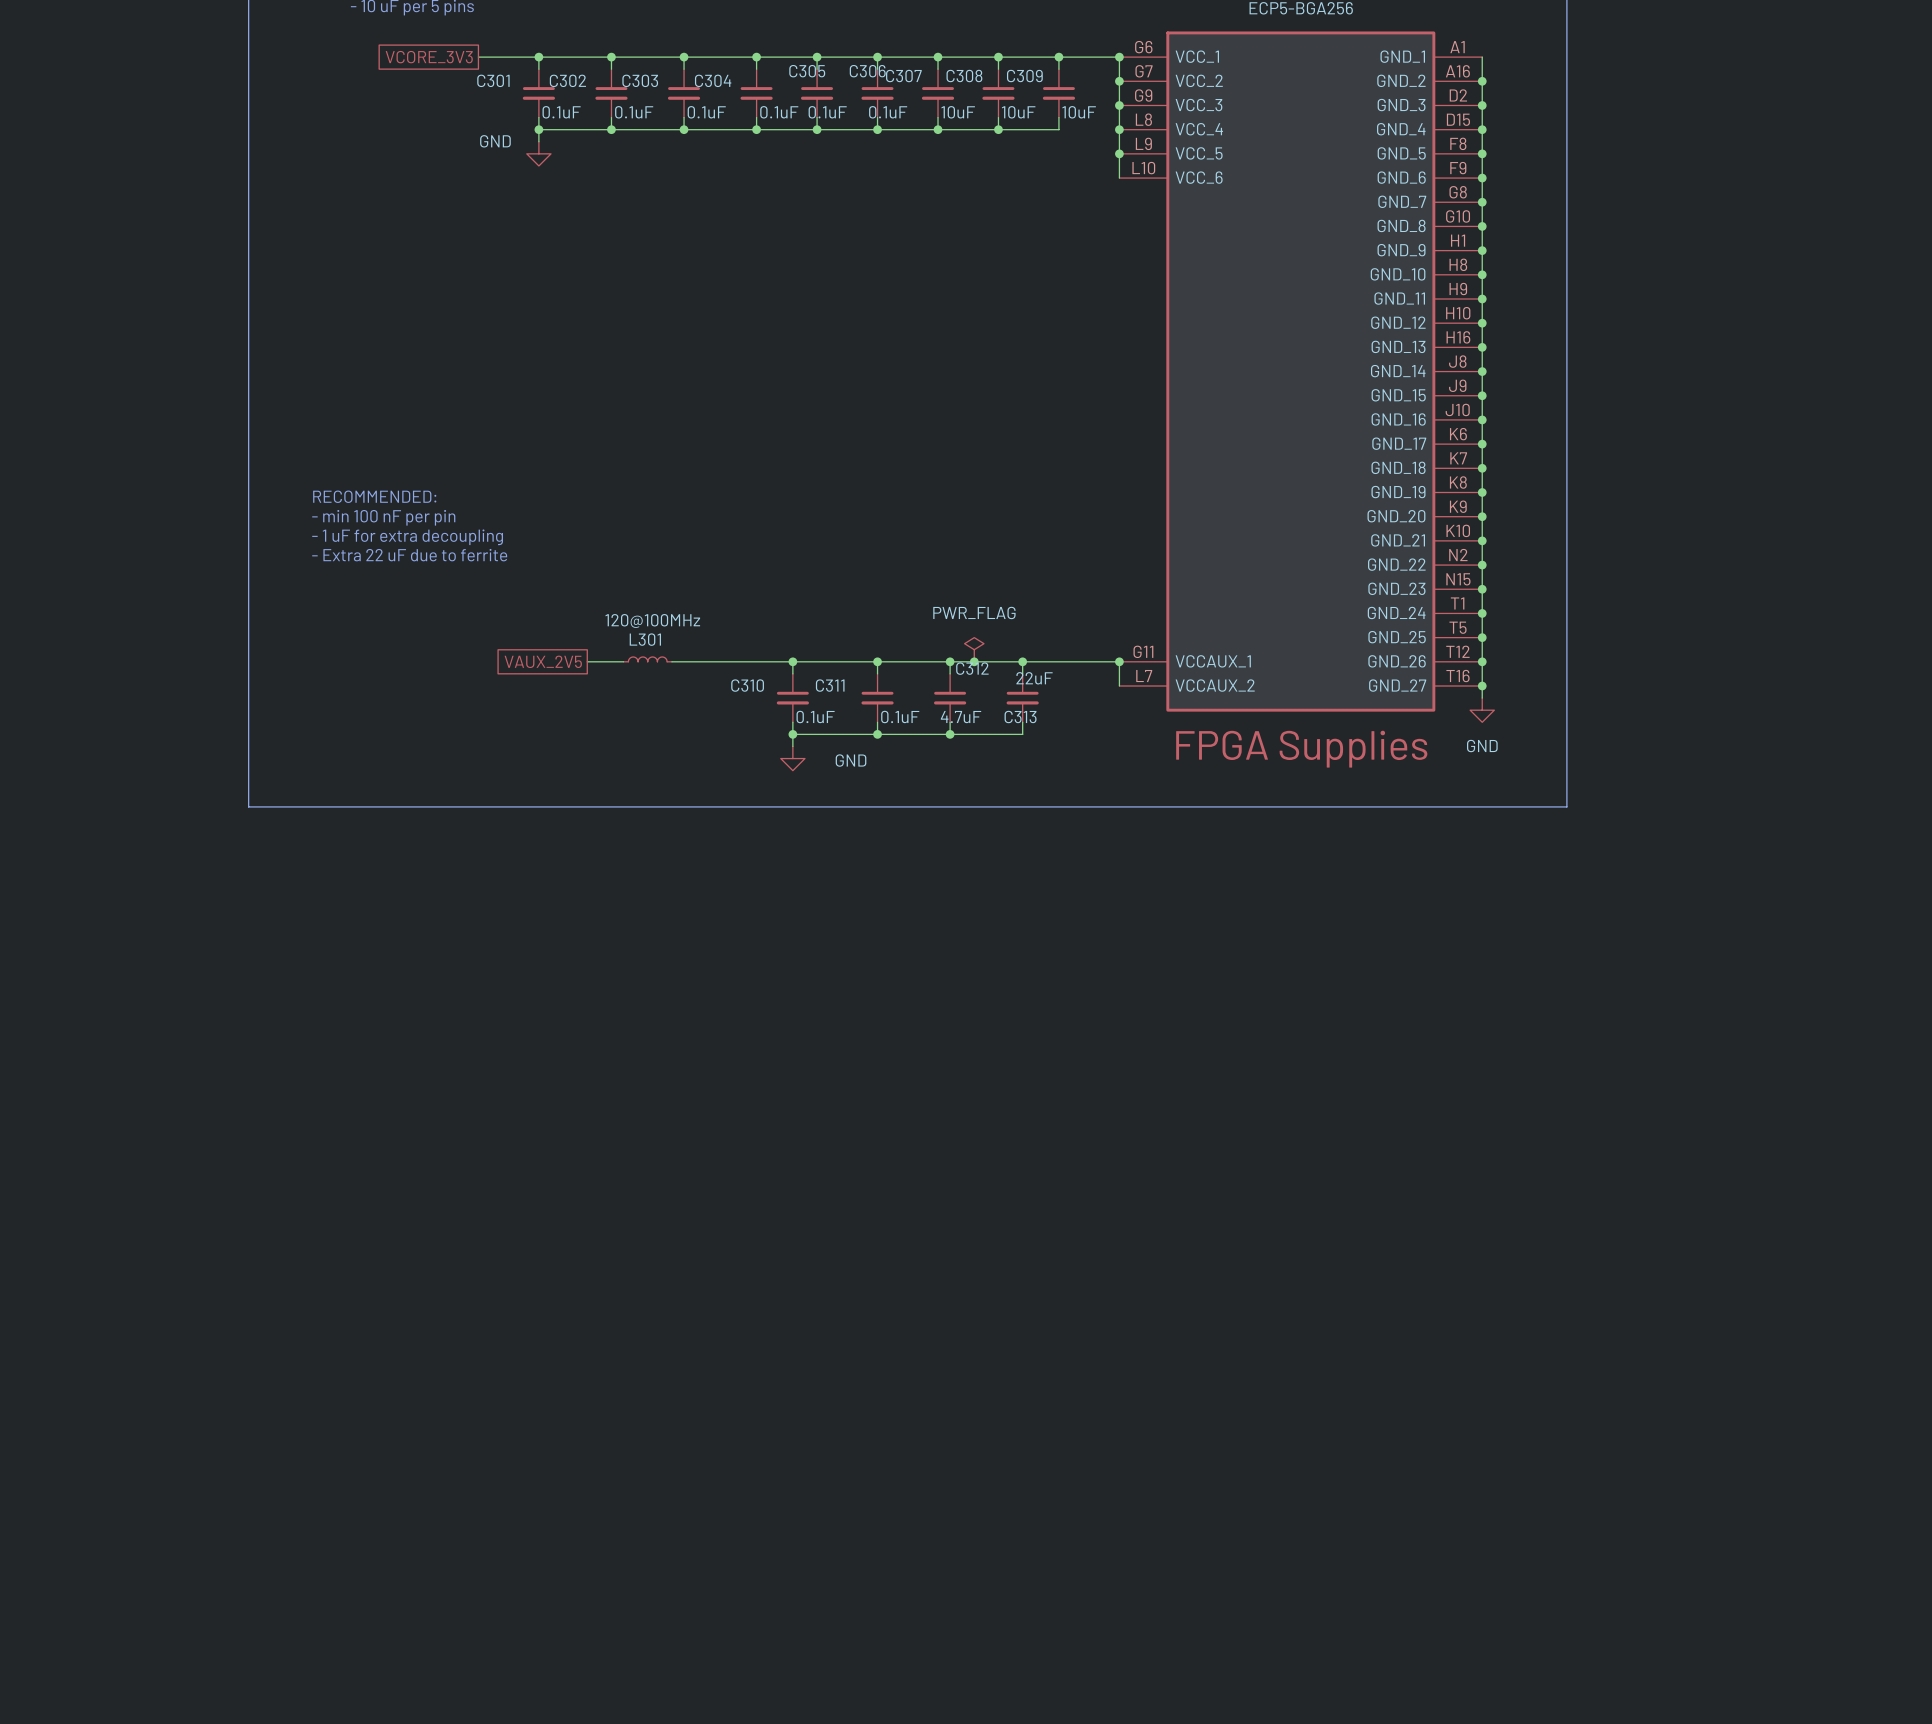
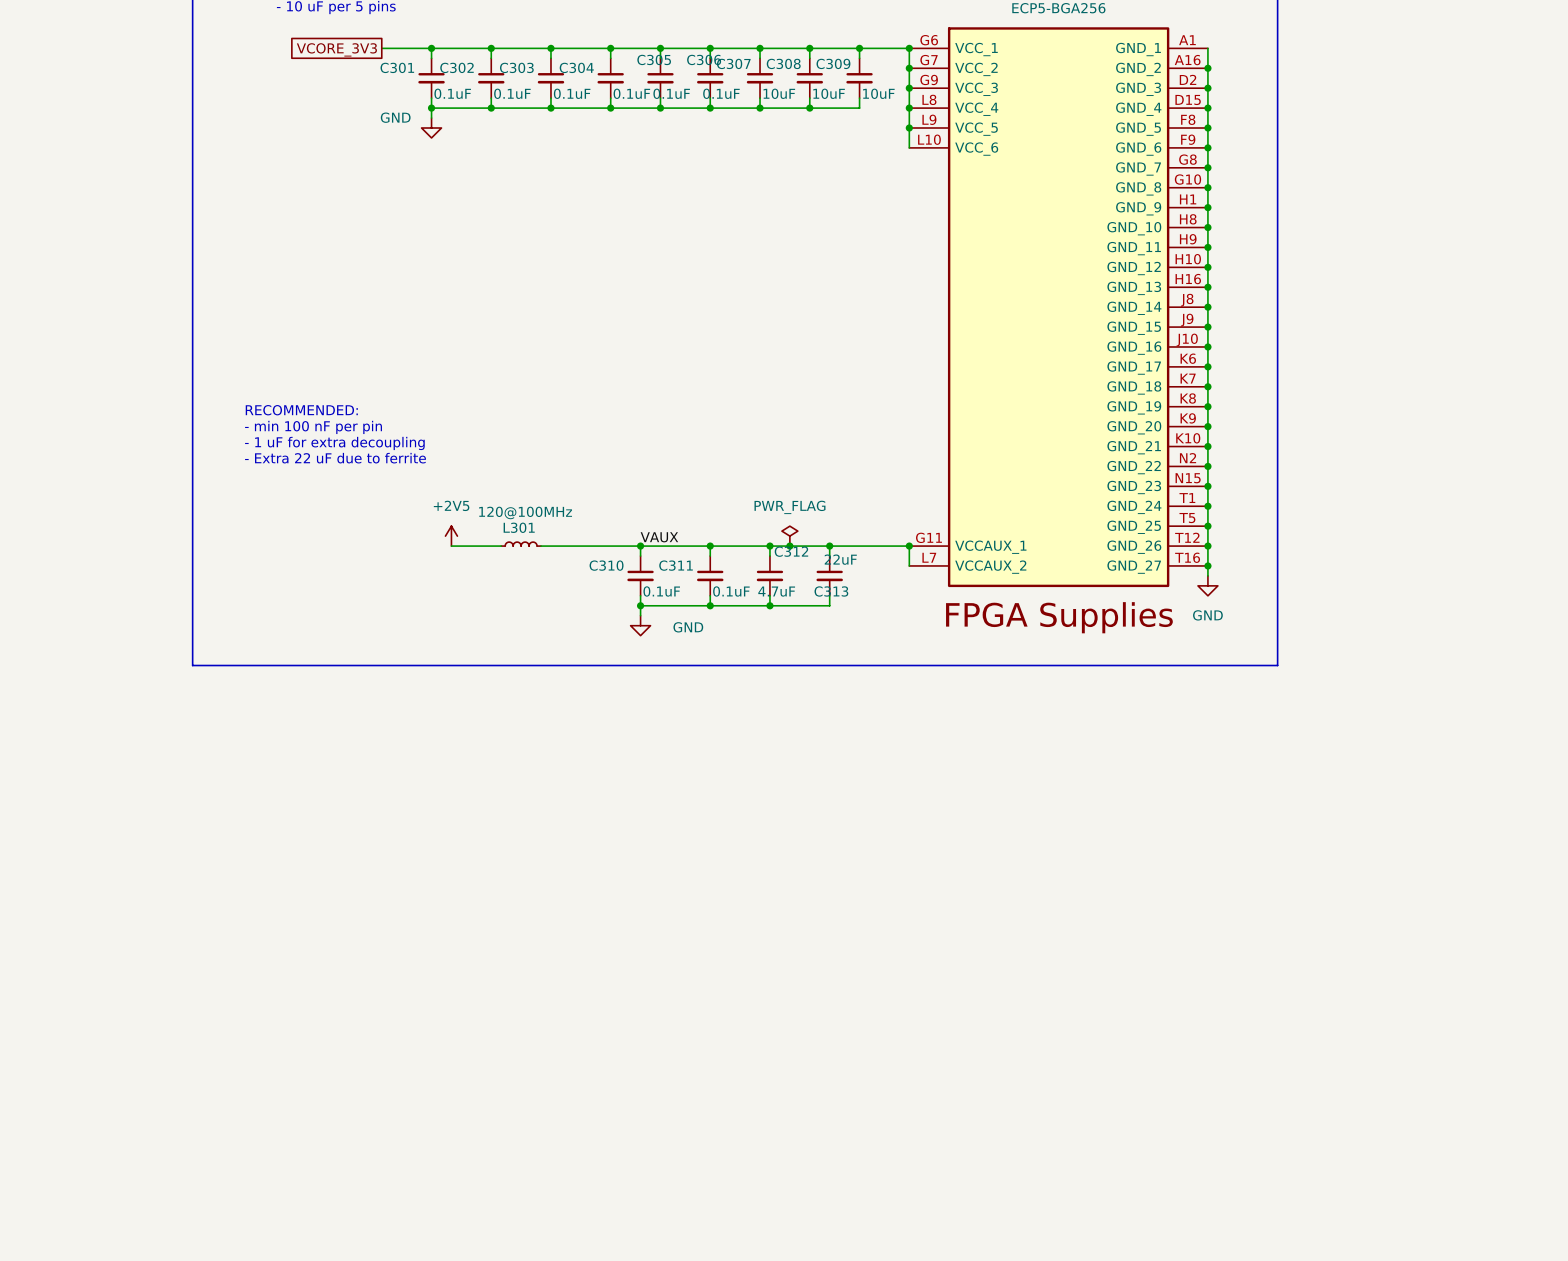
power symbol: none -> +2V5 (451, 536)
label: none -> VAUX (659, 537)
global label: VAUX_2V5 (543, 661) -> none
wire: none -> (451, 546) (471, 546)

